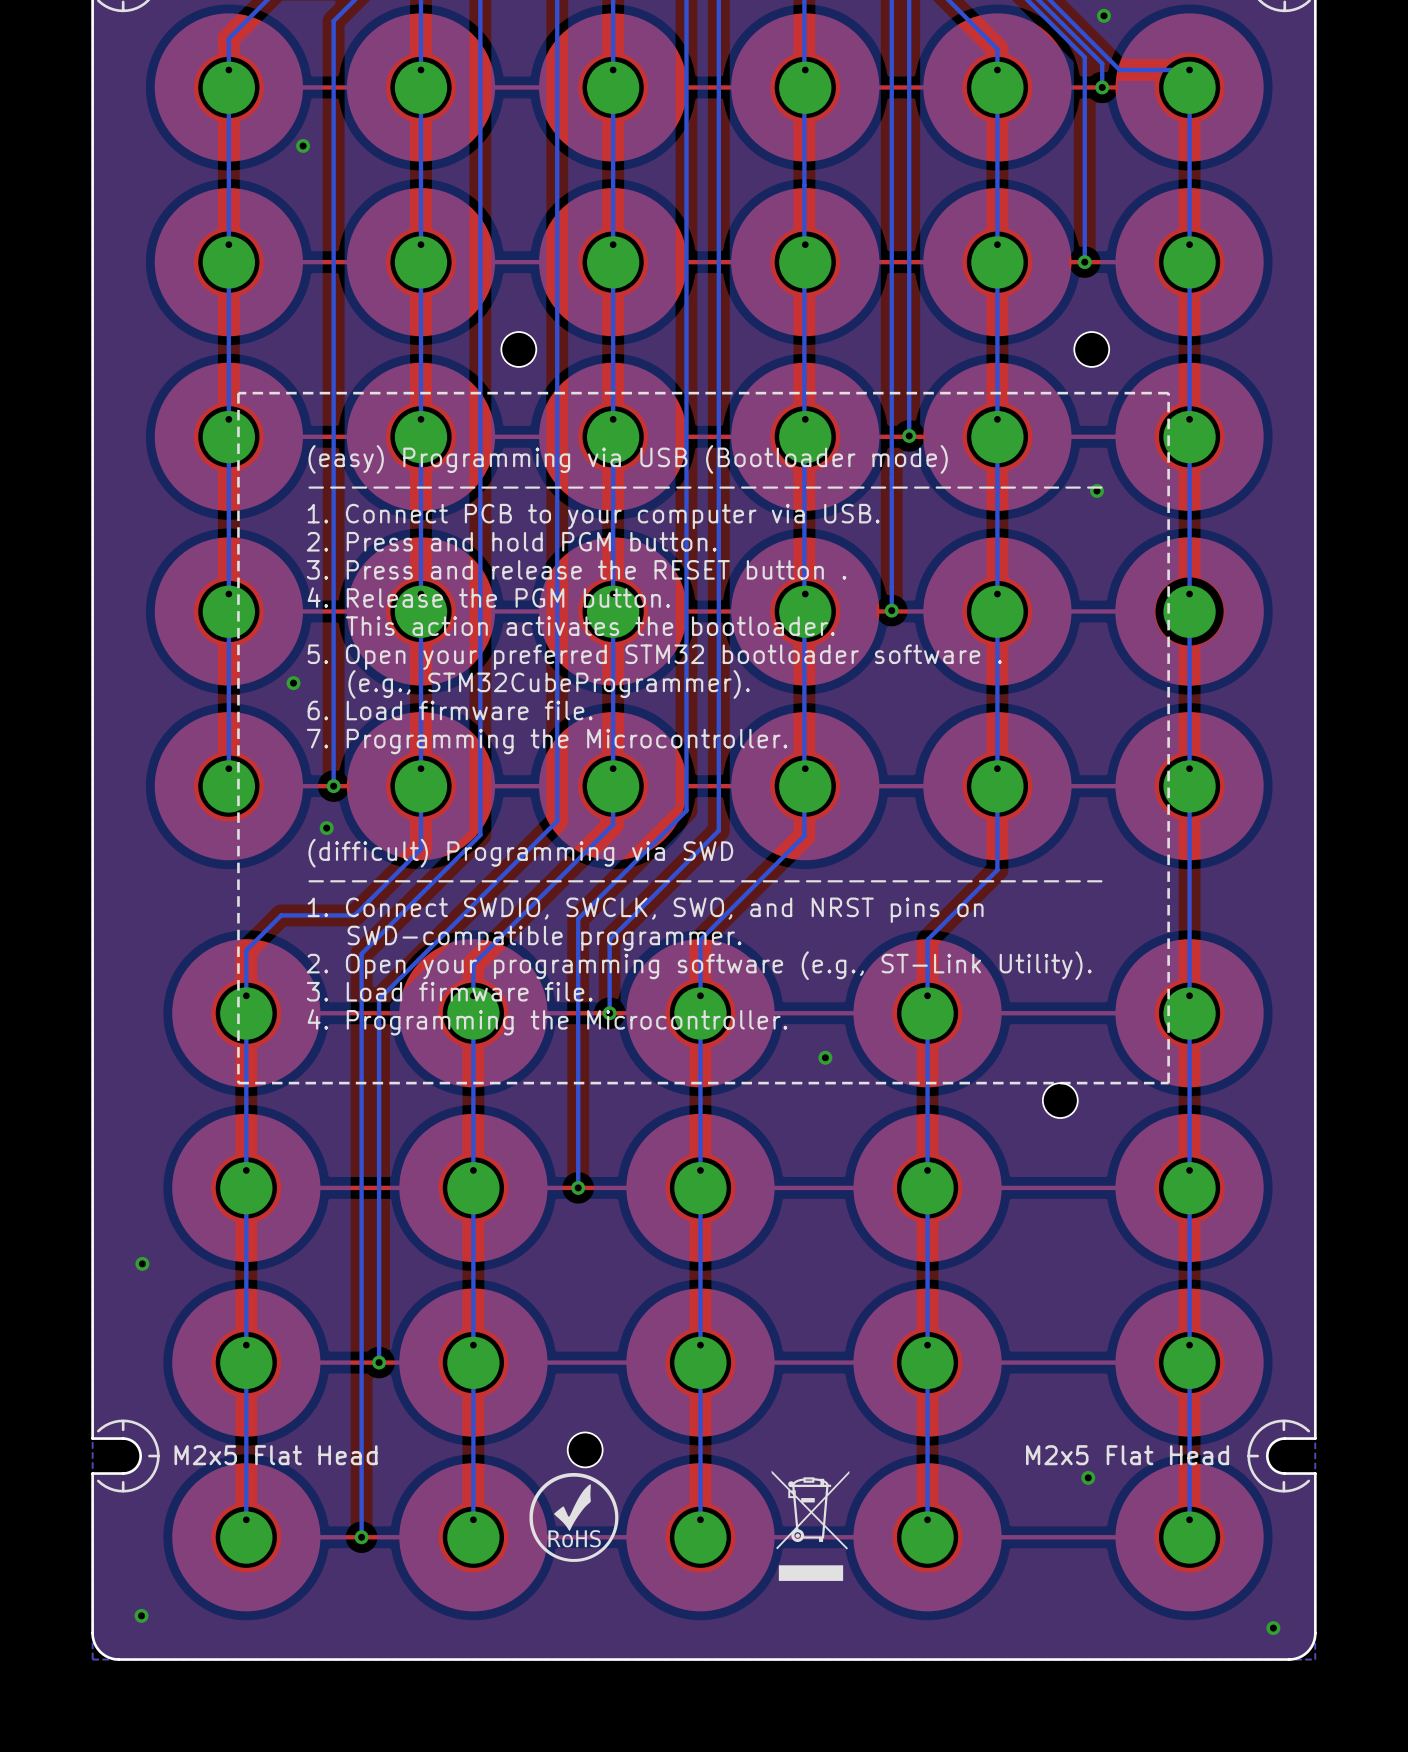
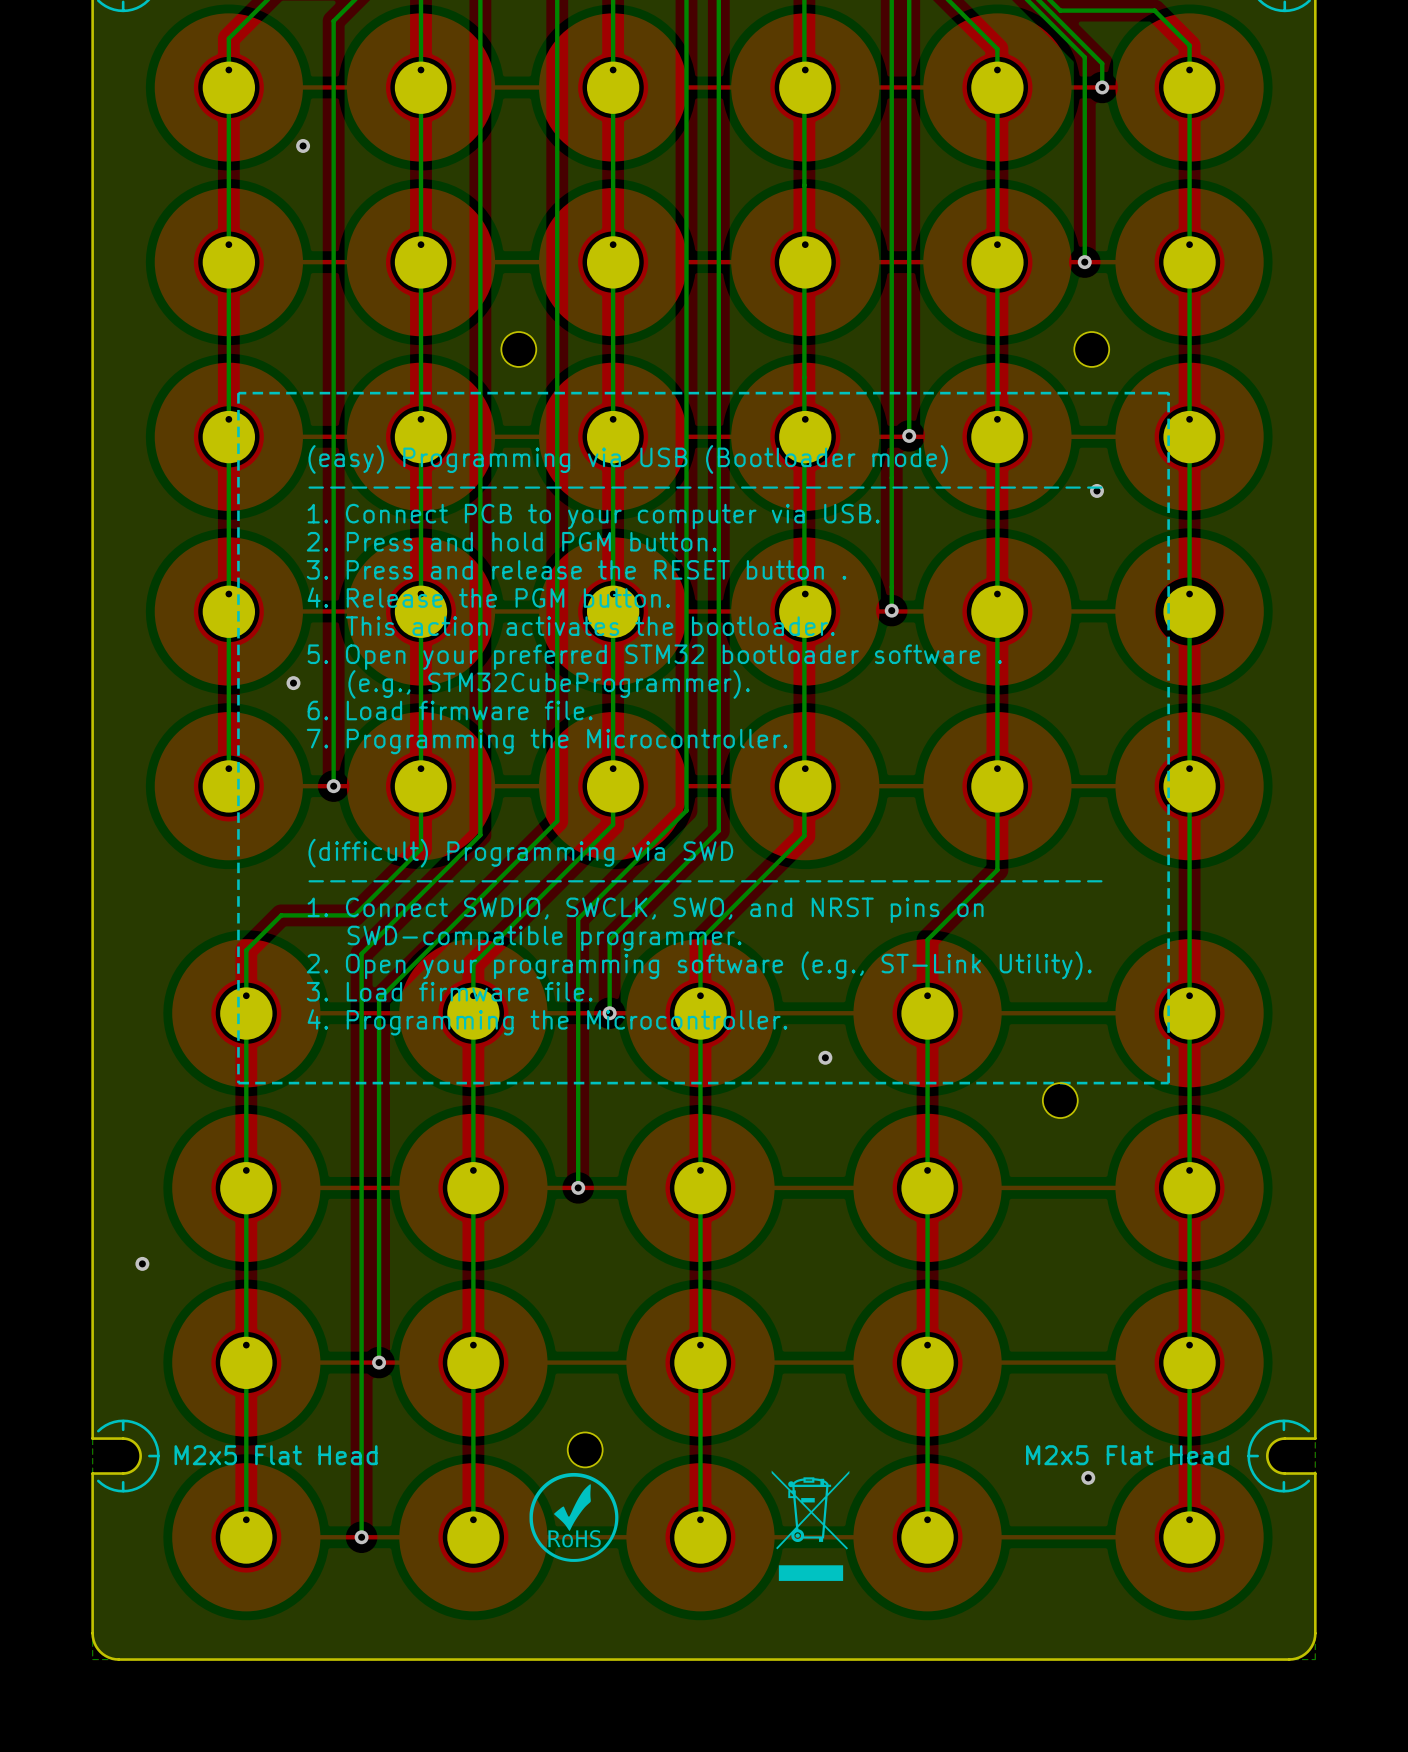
bottom track: (1060, 10) (1119, 69) (1189, 69) -> (1060, 10) (1154, 10) (1189, 45) (1189, 69)
via: (1103, 15) -> none
via: (326, 828) -> none
via: (141, 1615) -> none
via: (1273, 1628) -> none

